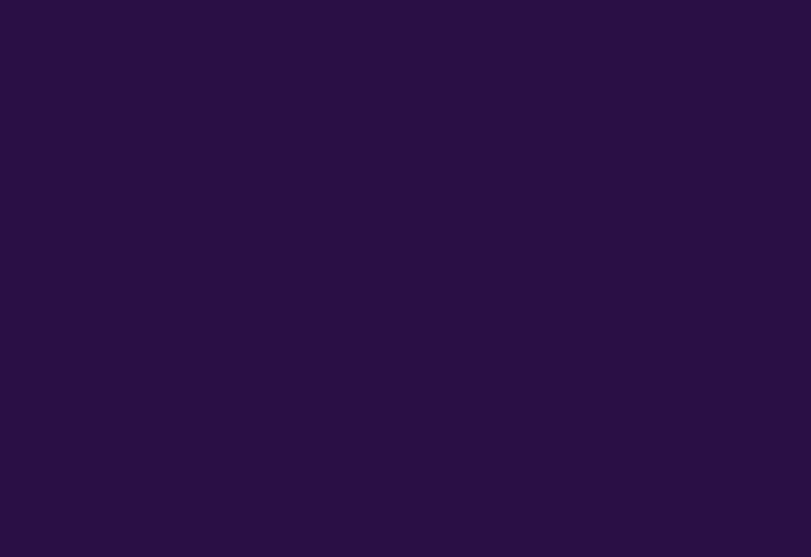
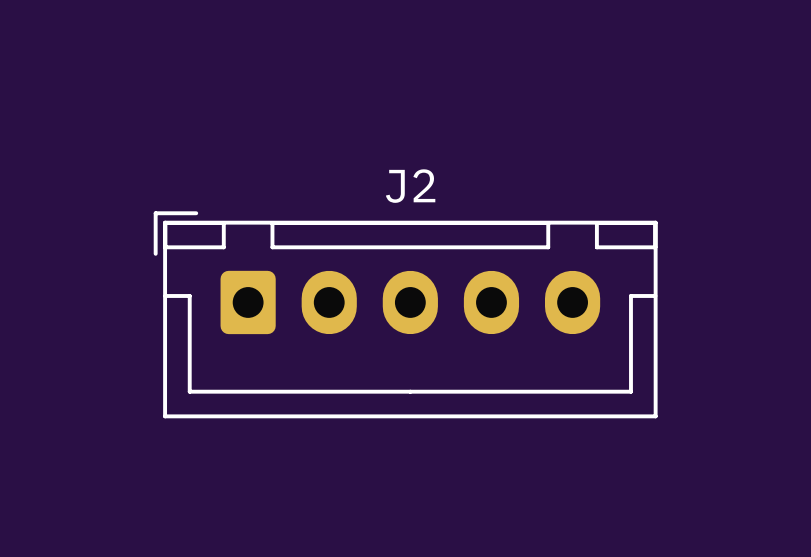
J2: none -> (405, 314)

